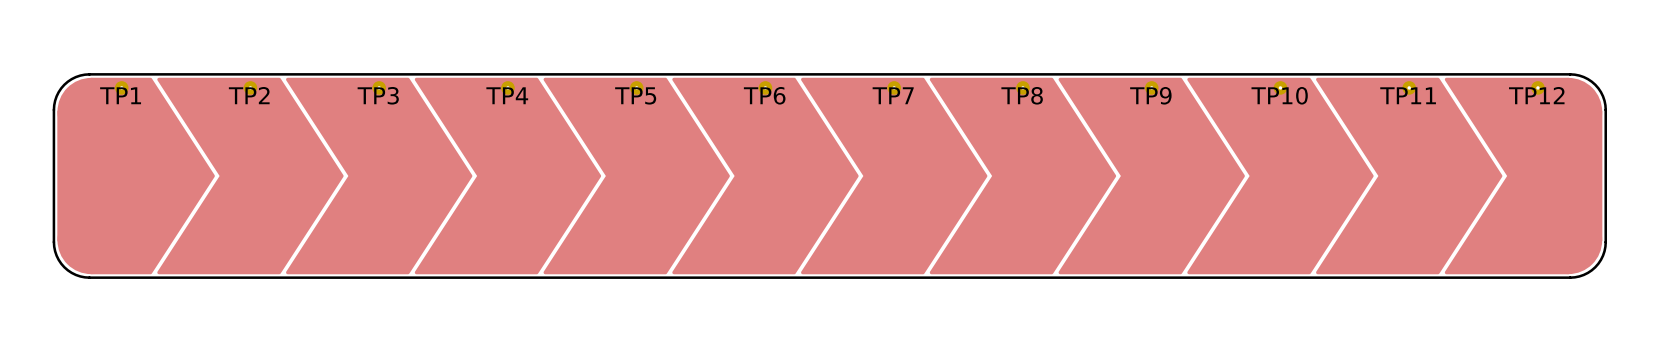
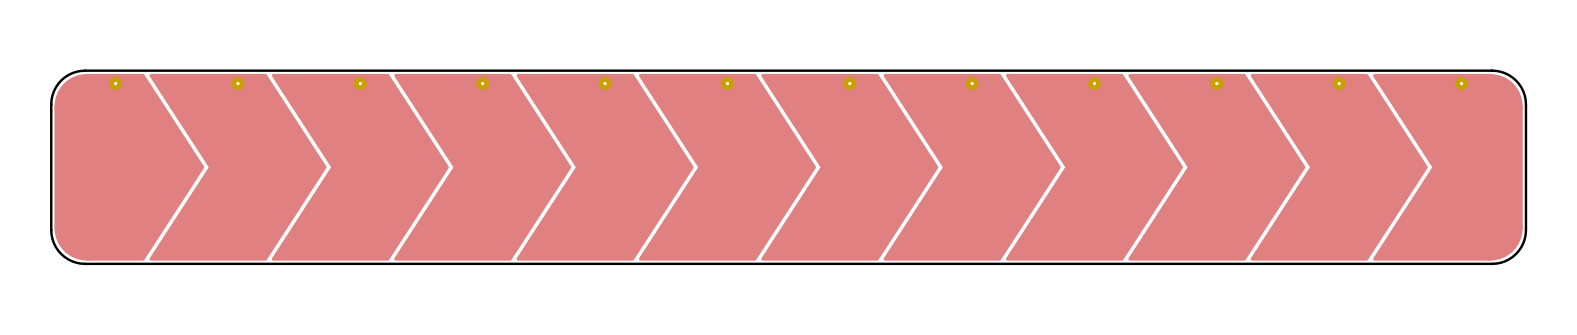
TP1 name: TP1 (120, 95) -> none
TP2 name: TP2 (249, 95) -> none
TP3 name: TP3 (378, 95) -> none
TP4 name: TP4 (507, 95) -> none
TP5 name: TP5 (635, 95) -> none
TP6 name: TP6 (764, 95) -> none
TP7 name: TP7 (893, 95) -> none
TP8 name: TP8 (1022, 95) -> none
TP9 name: TP9 (1150, 95) -> none
TP10 name: TP10 (1279, 95) -> none
TP11 name: TP11 (1408, 95) -> none
TP12 name: TP12 (1536, 95) -> none

